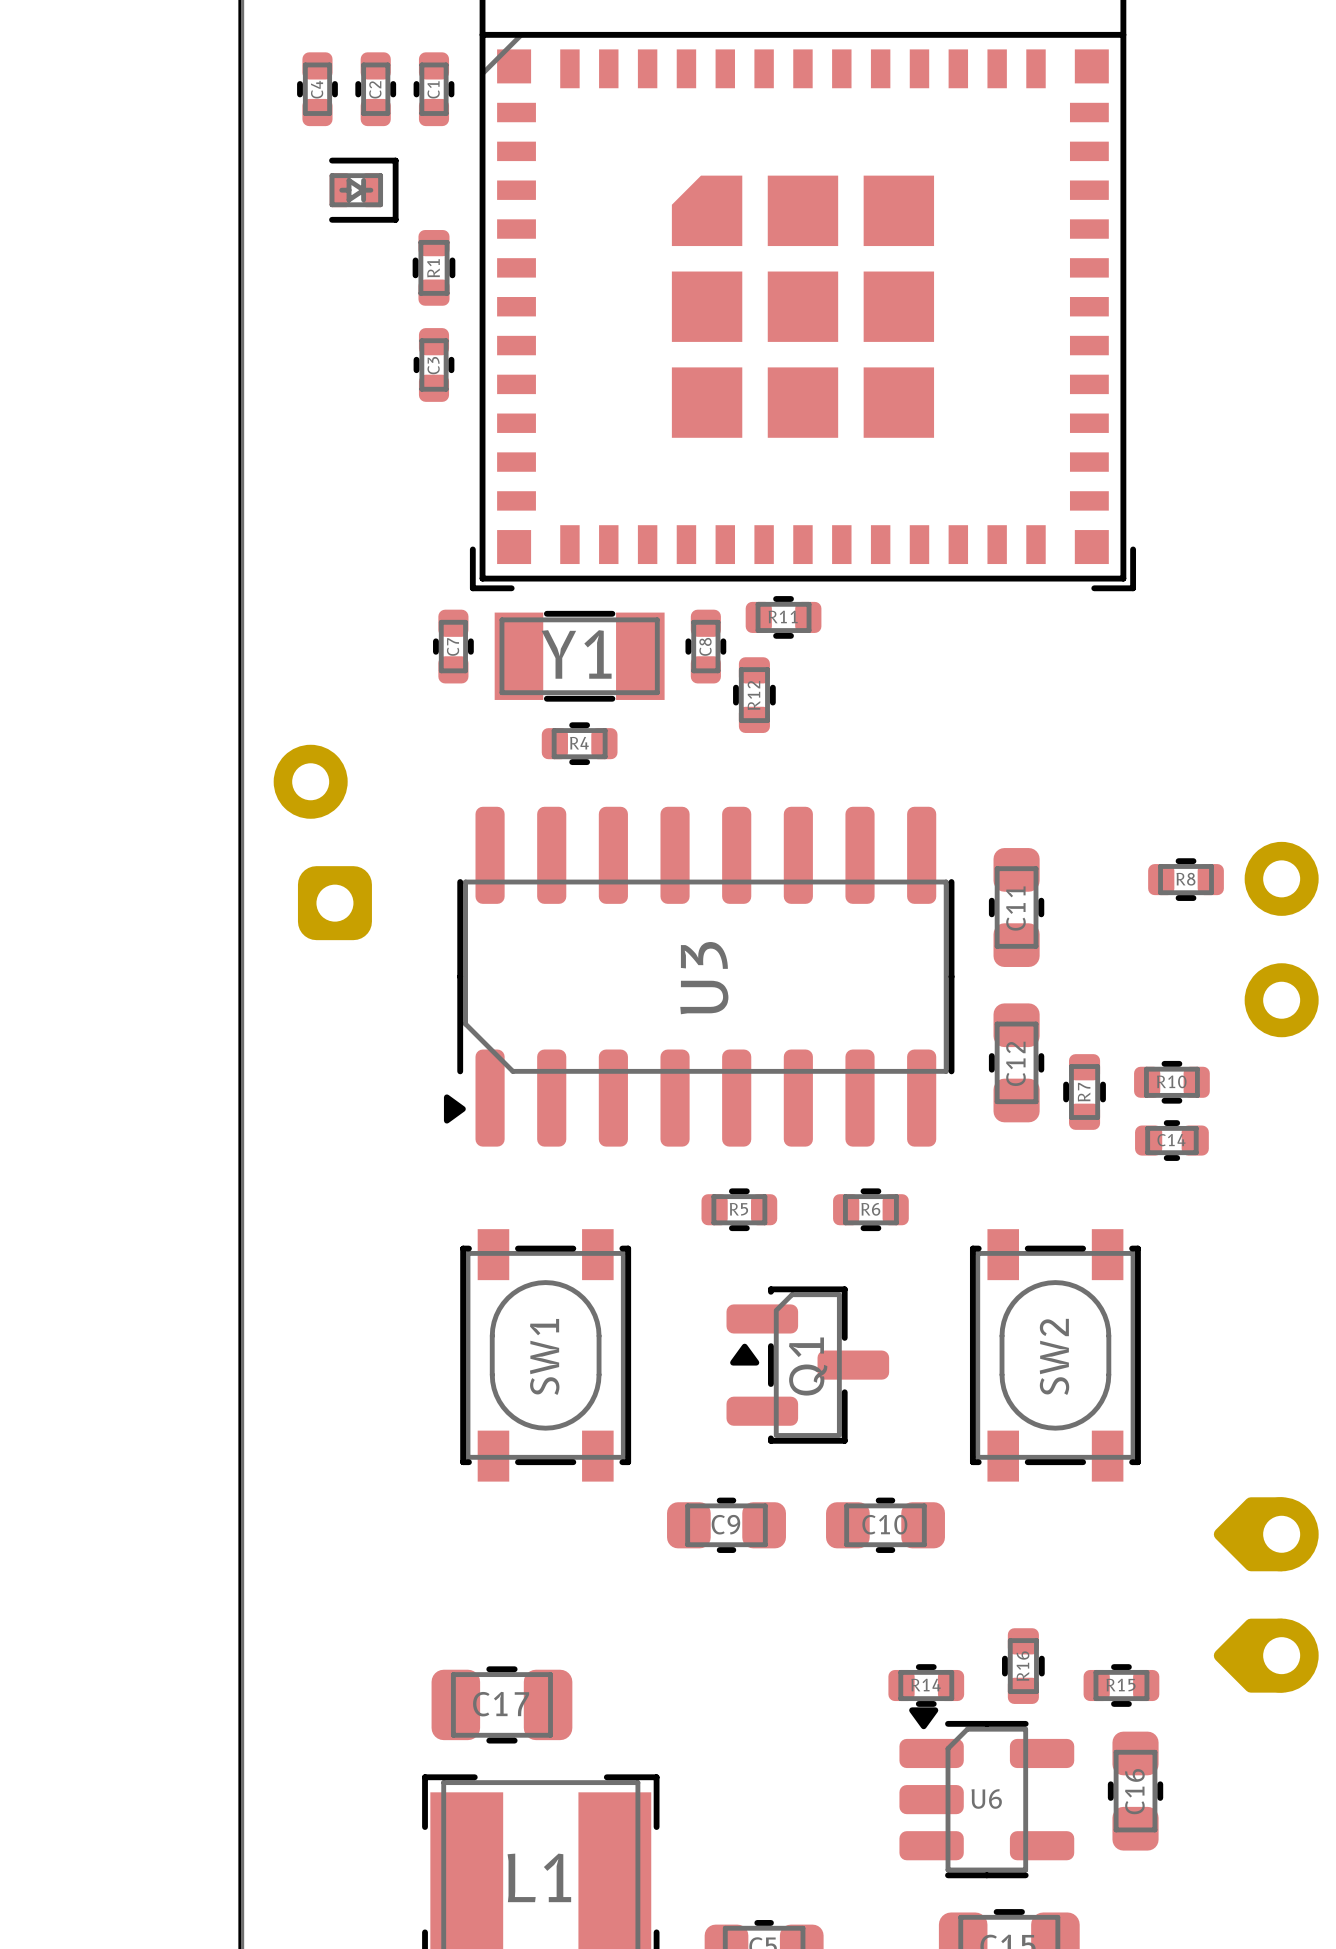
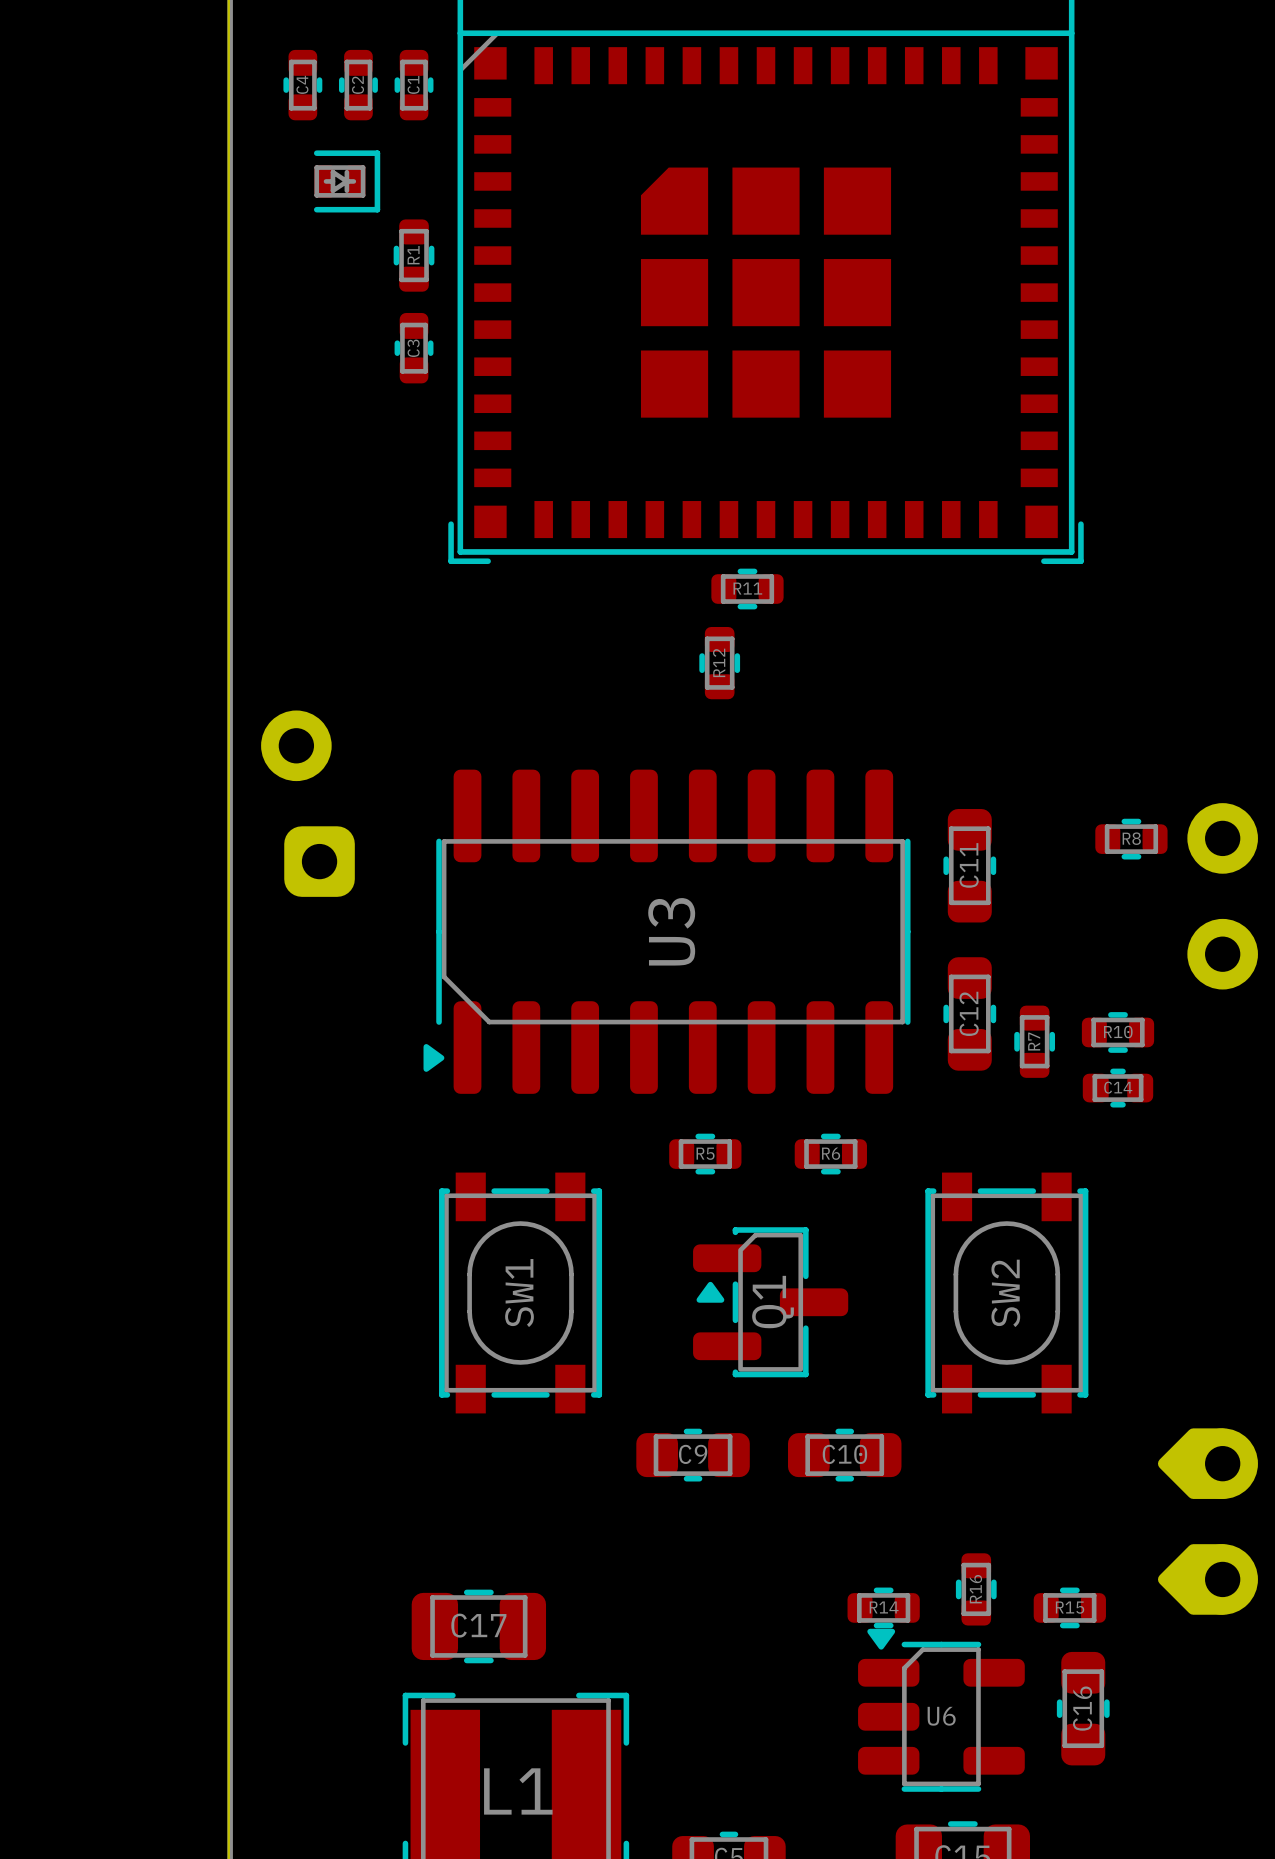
C7: (453, 646) -> none
C8: (705, 646) -> none
Y1: (579, 656) -> none
R4: (579, 743) -> none

